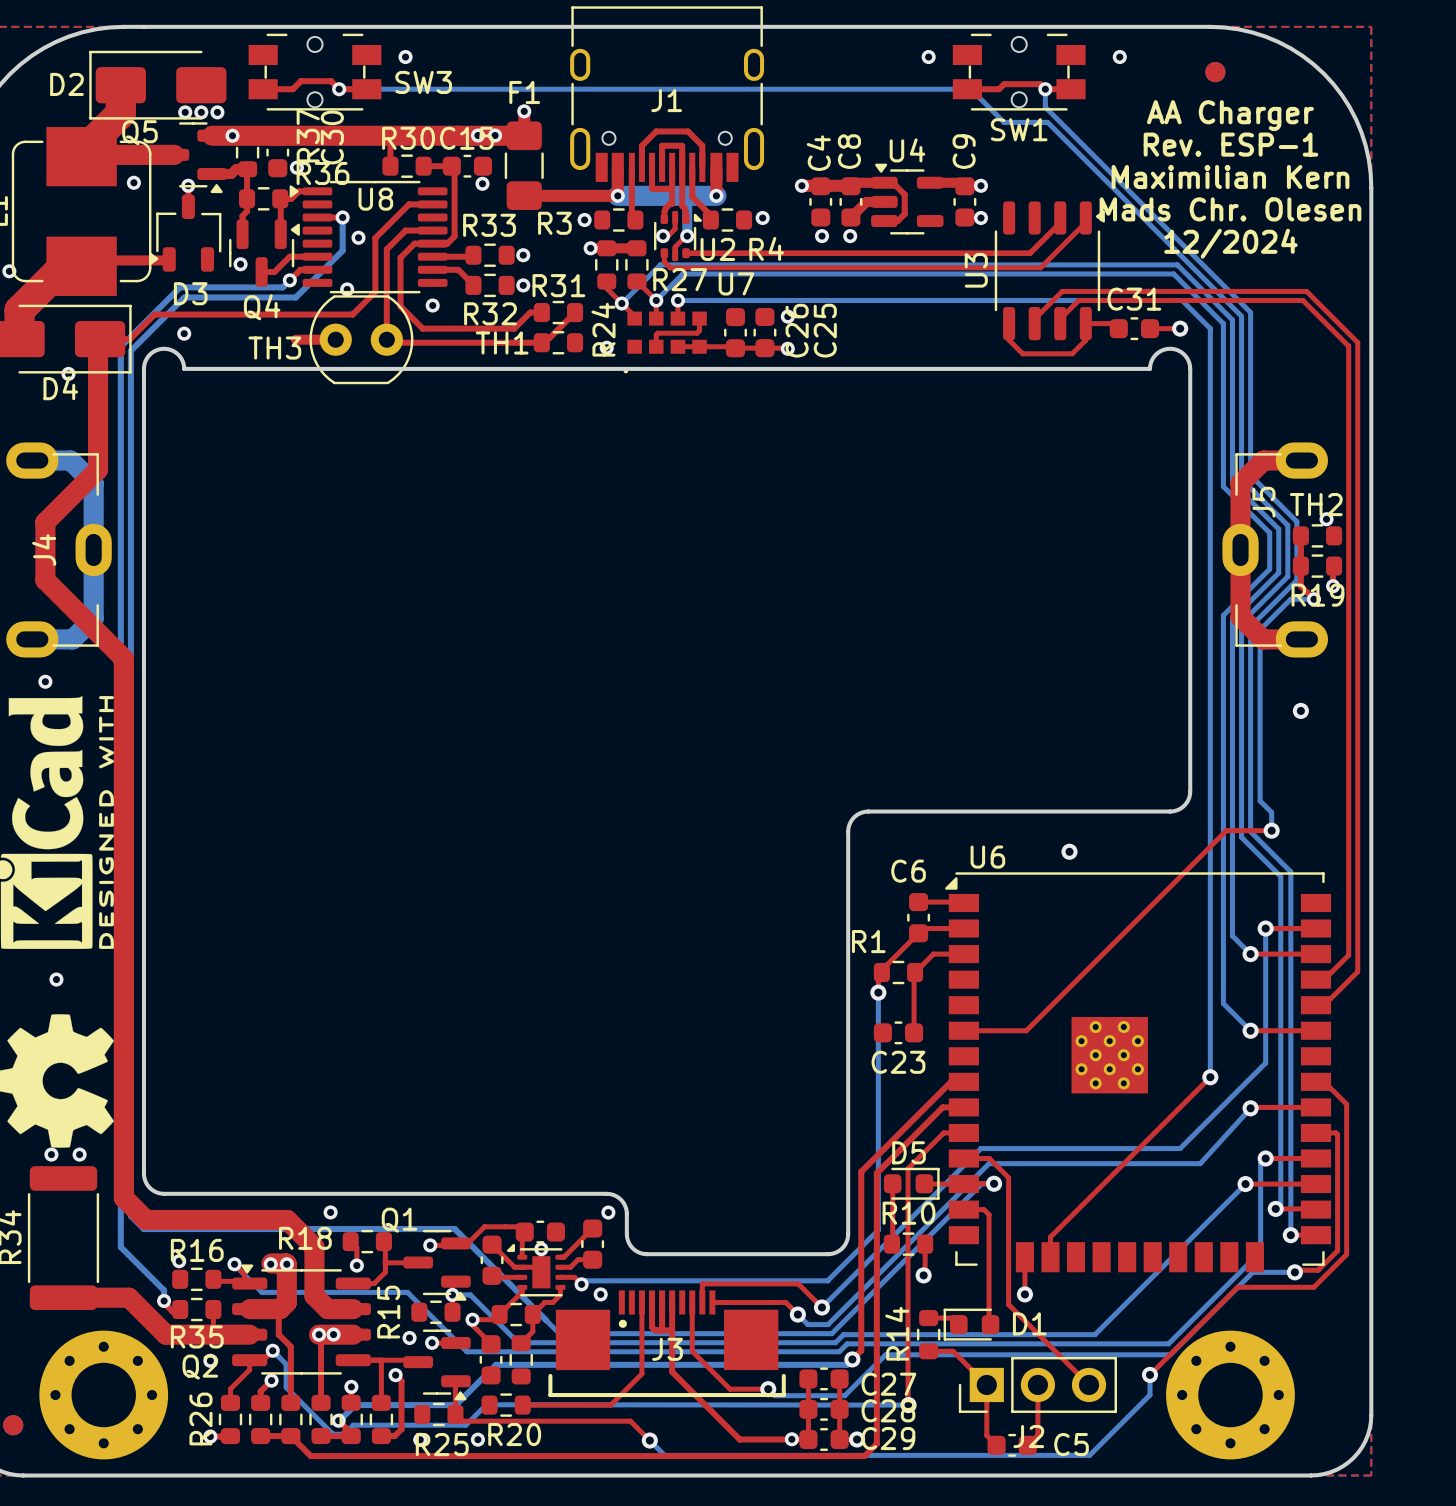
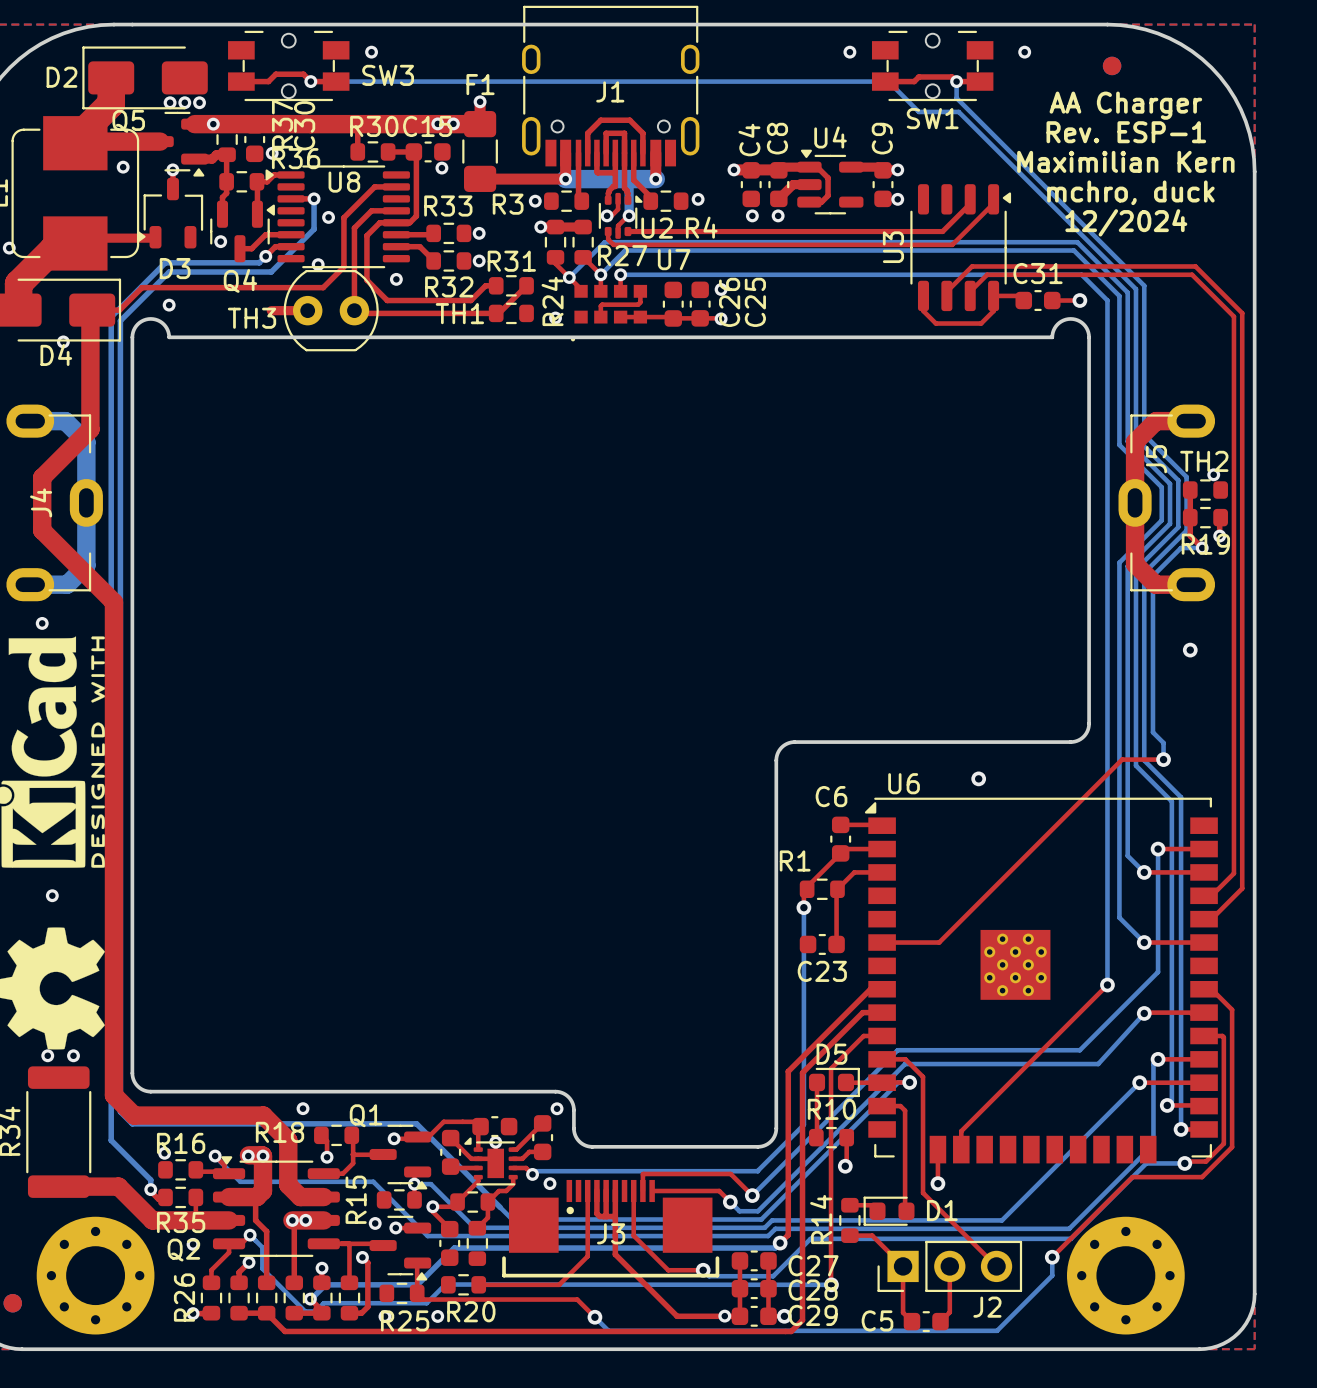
text: Mads Chr. Olesen (1230, 209) -> mchro, duck (1130, 192)
J2 name position: J2 (1028, 1436) -> J2 (987, 1307)
C5 name position: C5 (1071, 1444) -> C5 (877, 1320)

